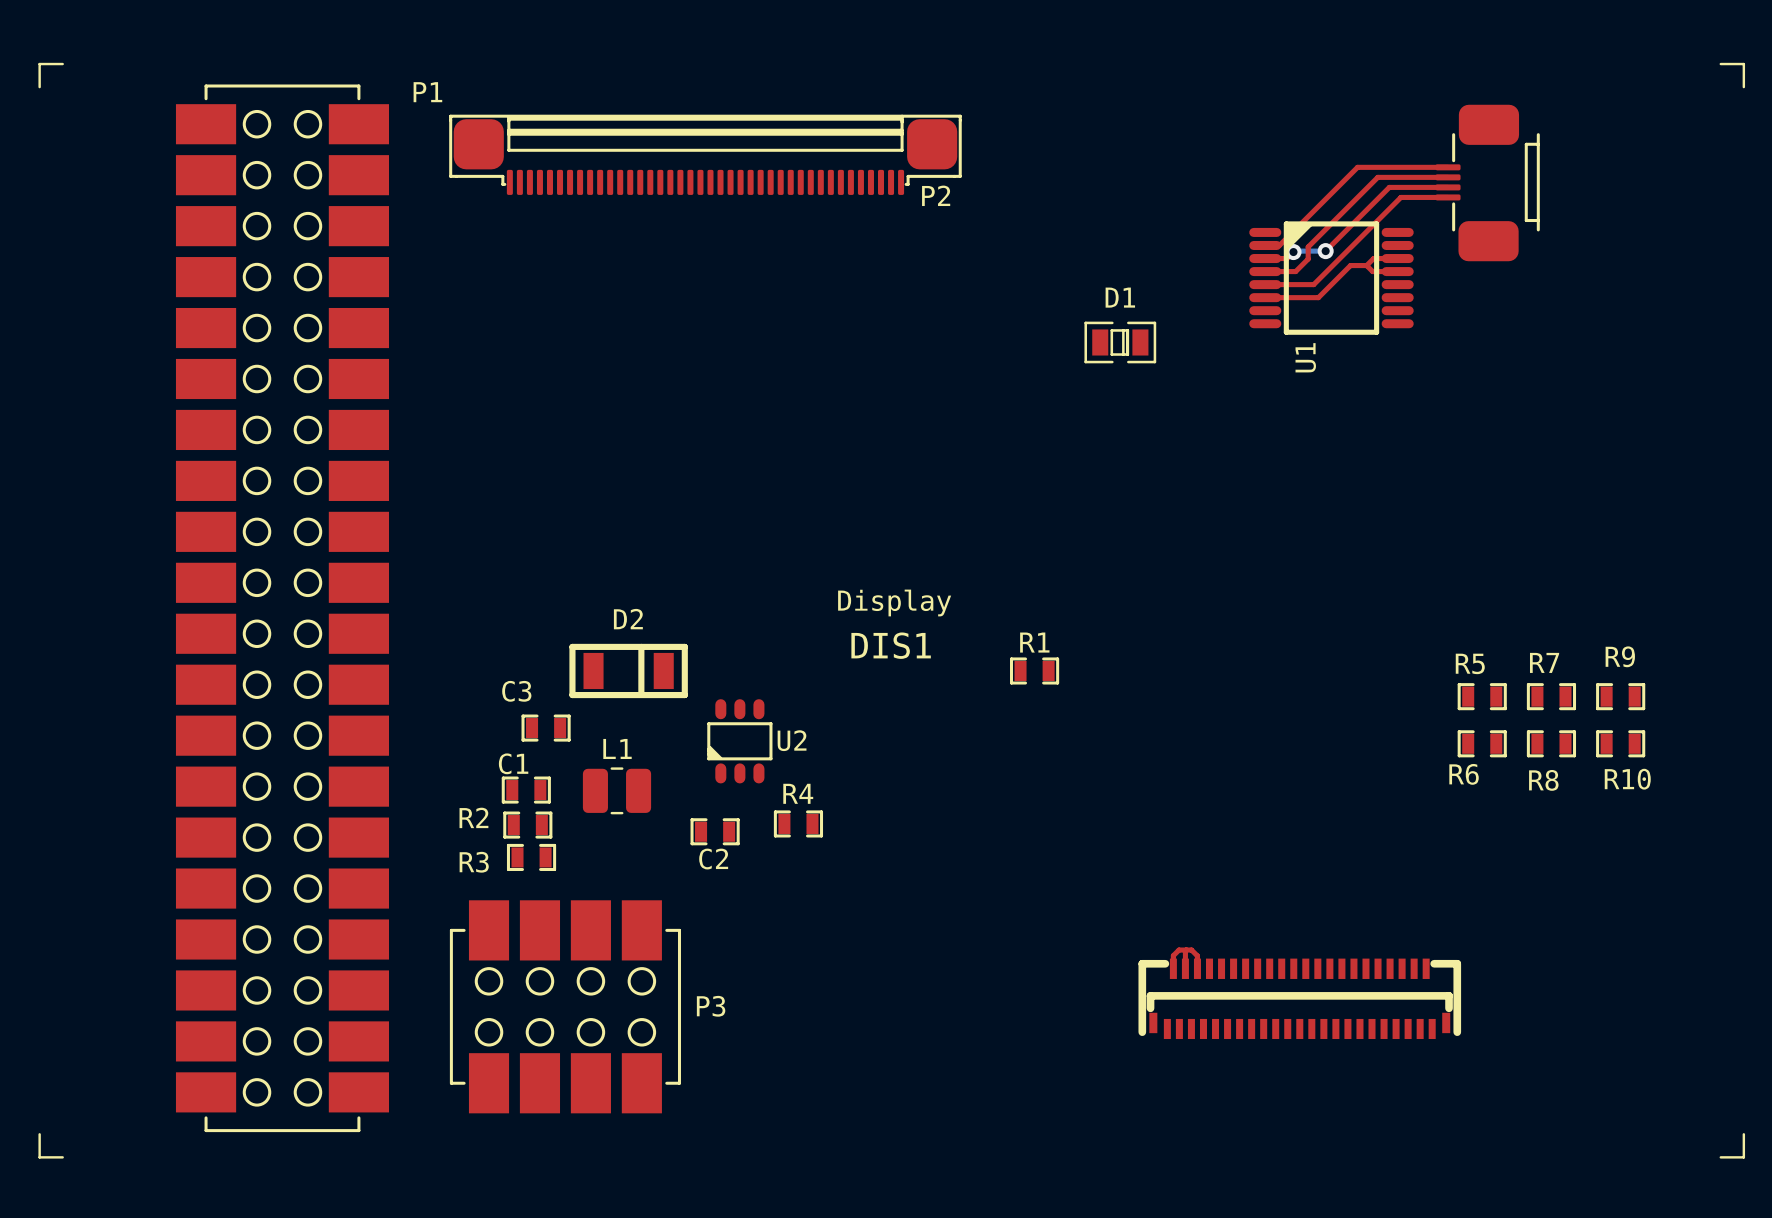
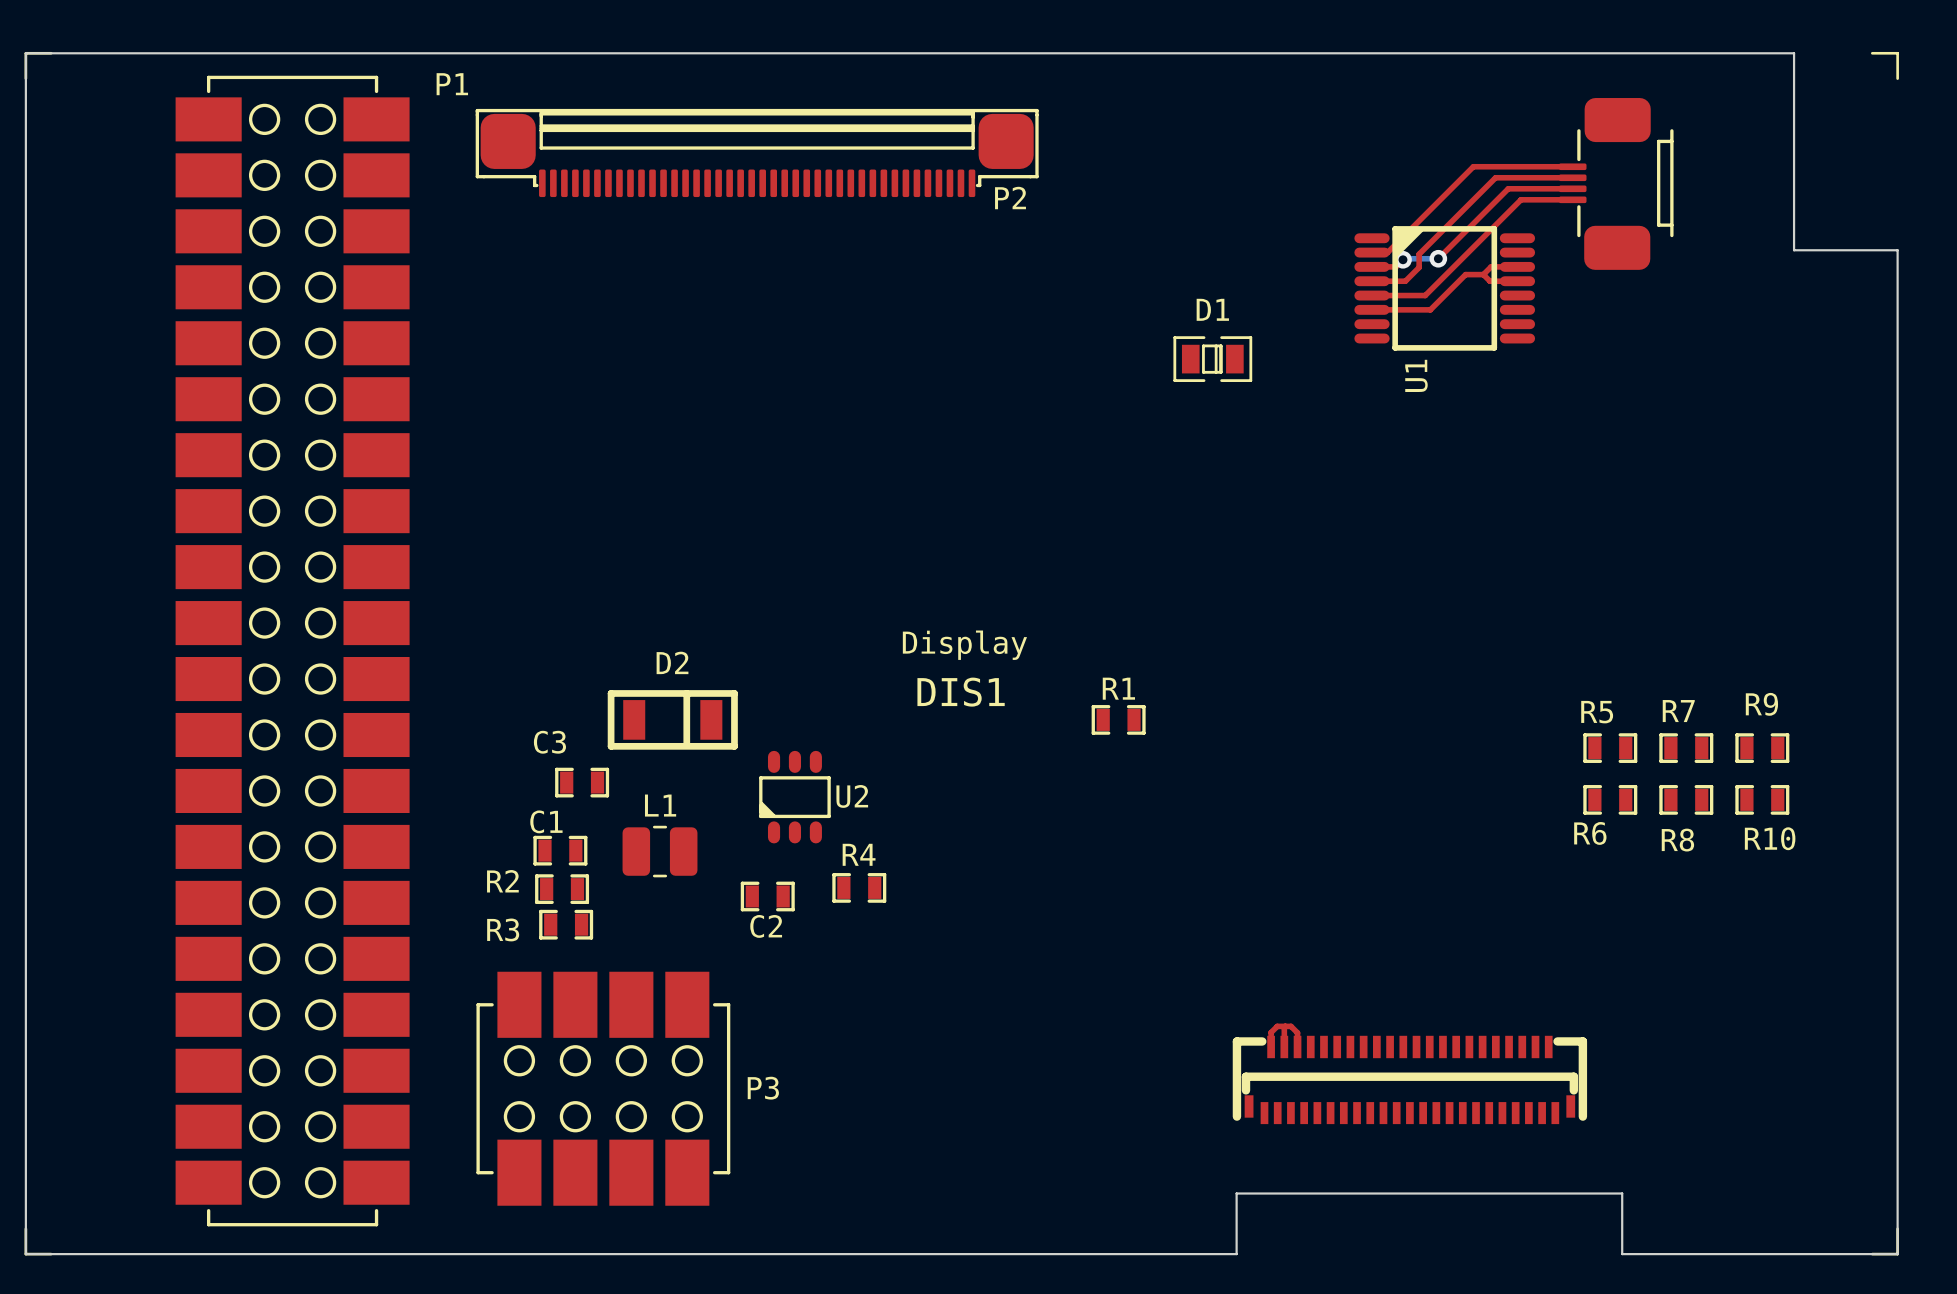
board edge: none -> (25, 53) (25, 1254) (1236, 1254) (1236, 1193) (1622, 1193) (1622, 1254) (1897, 1254) (1897, 250) (1794, 250) (1794, 53) (25, 53)

